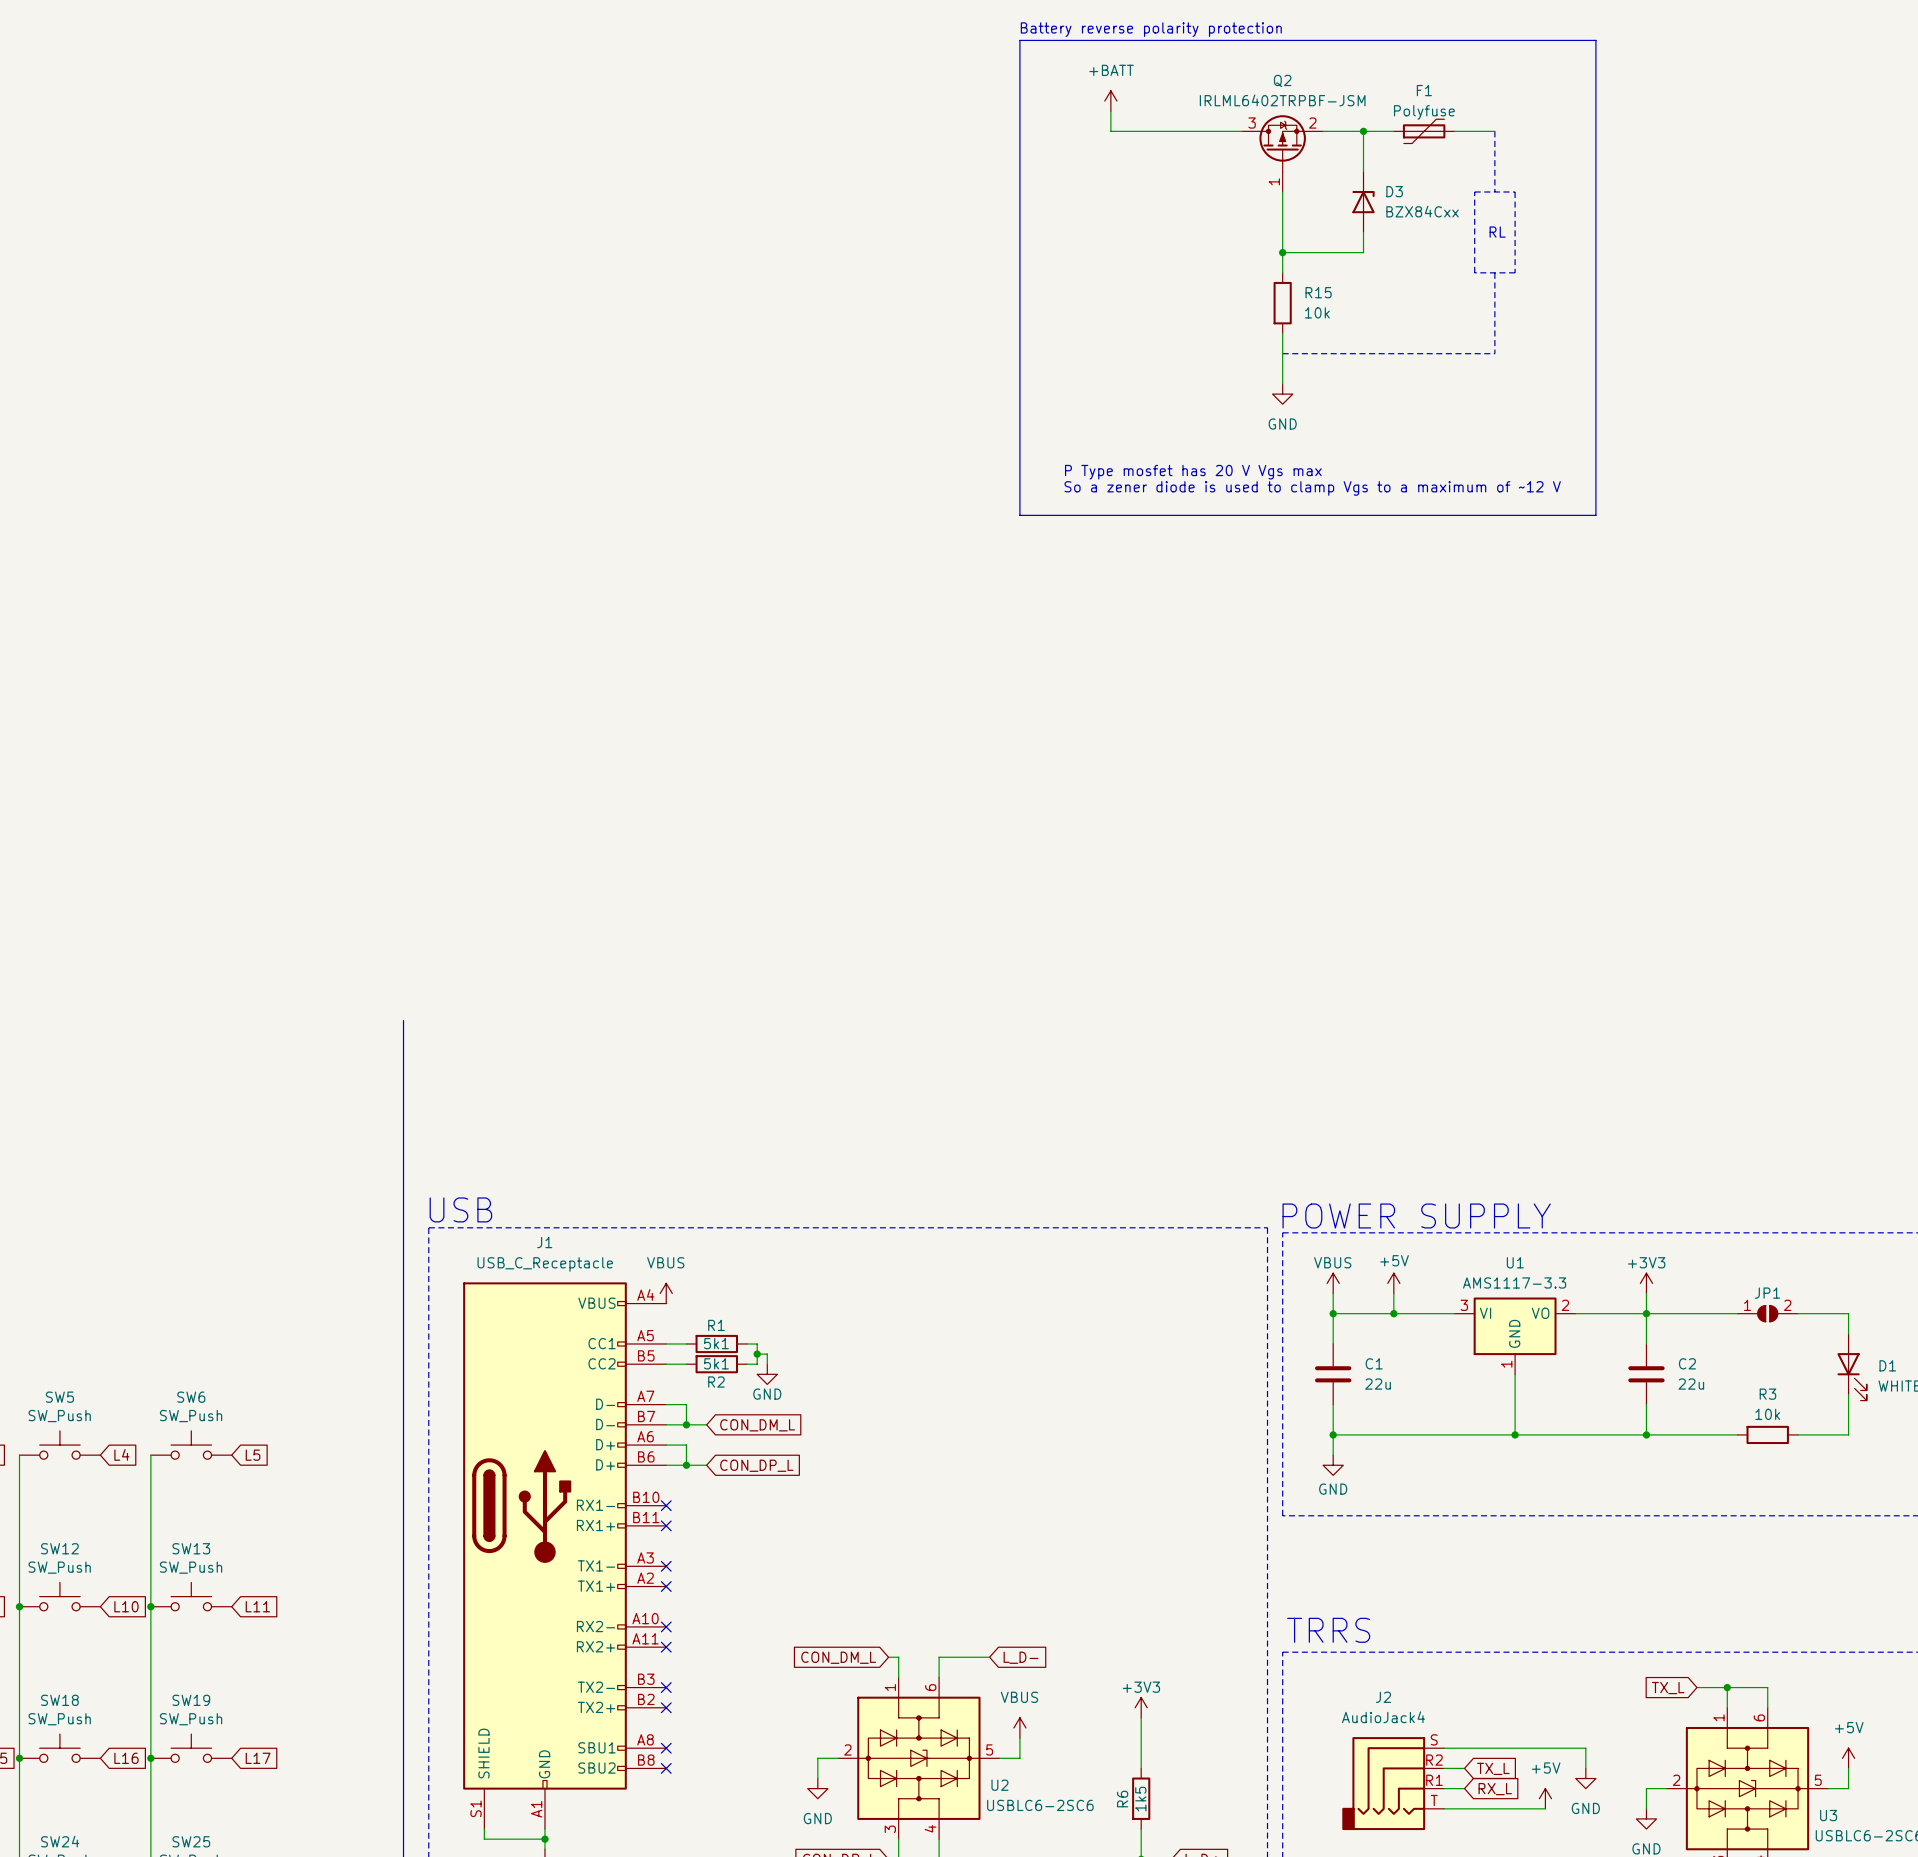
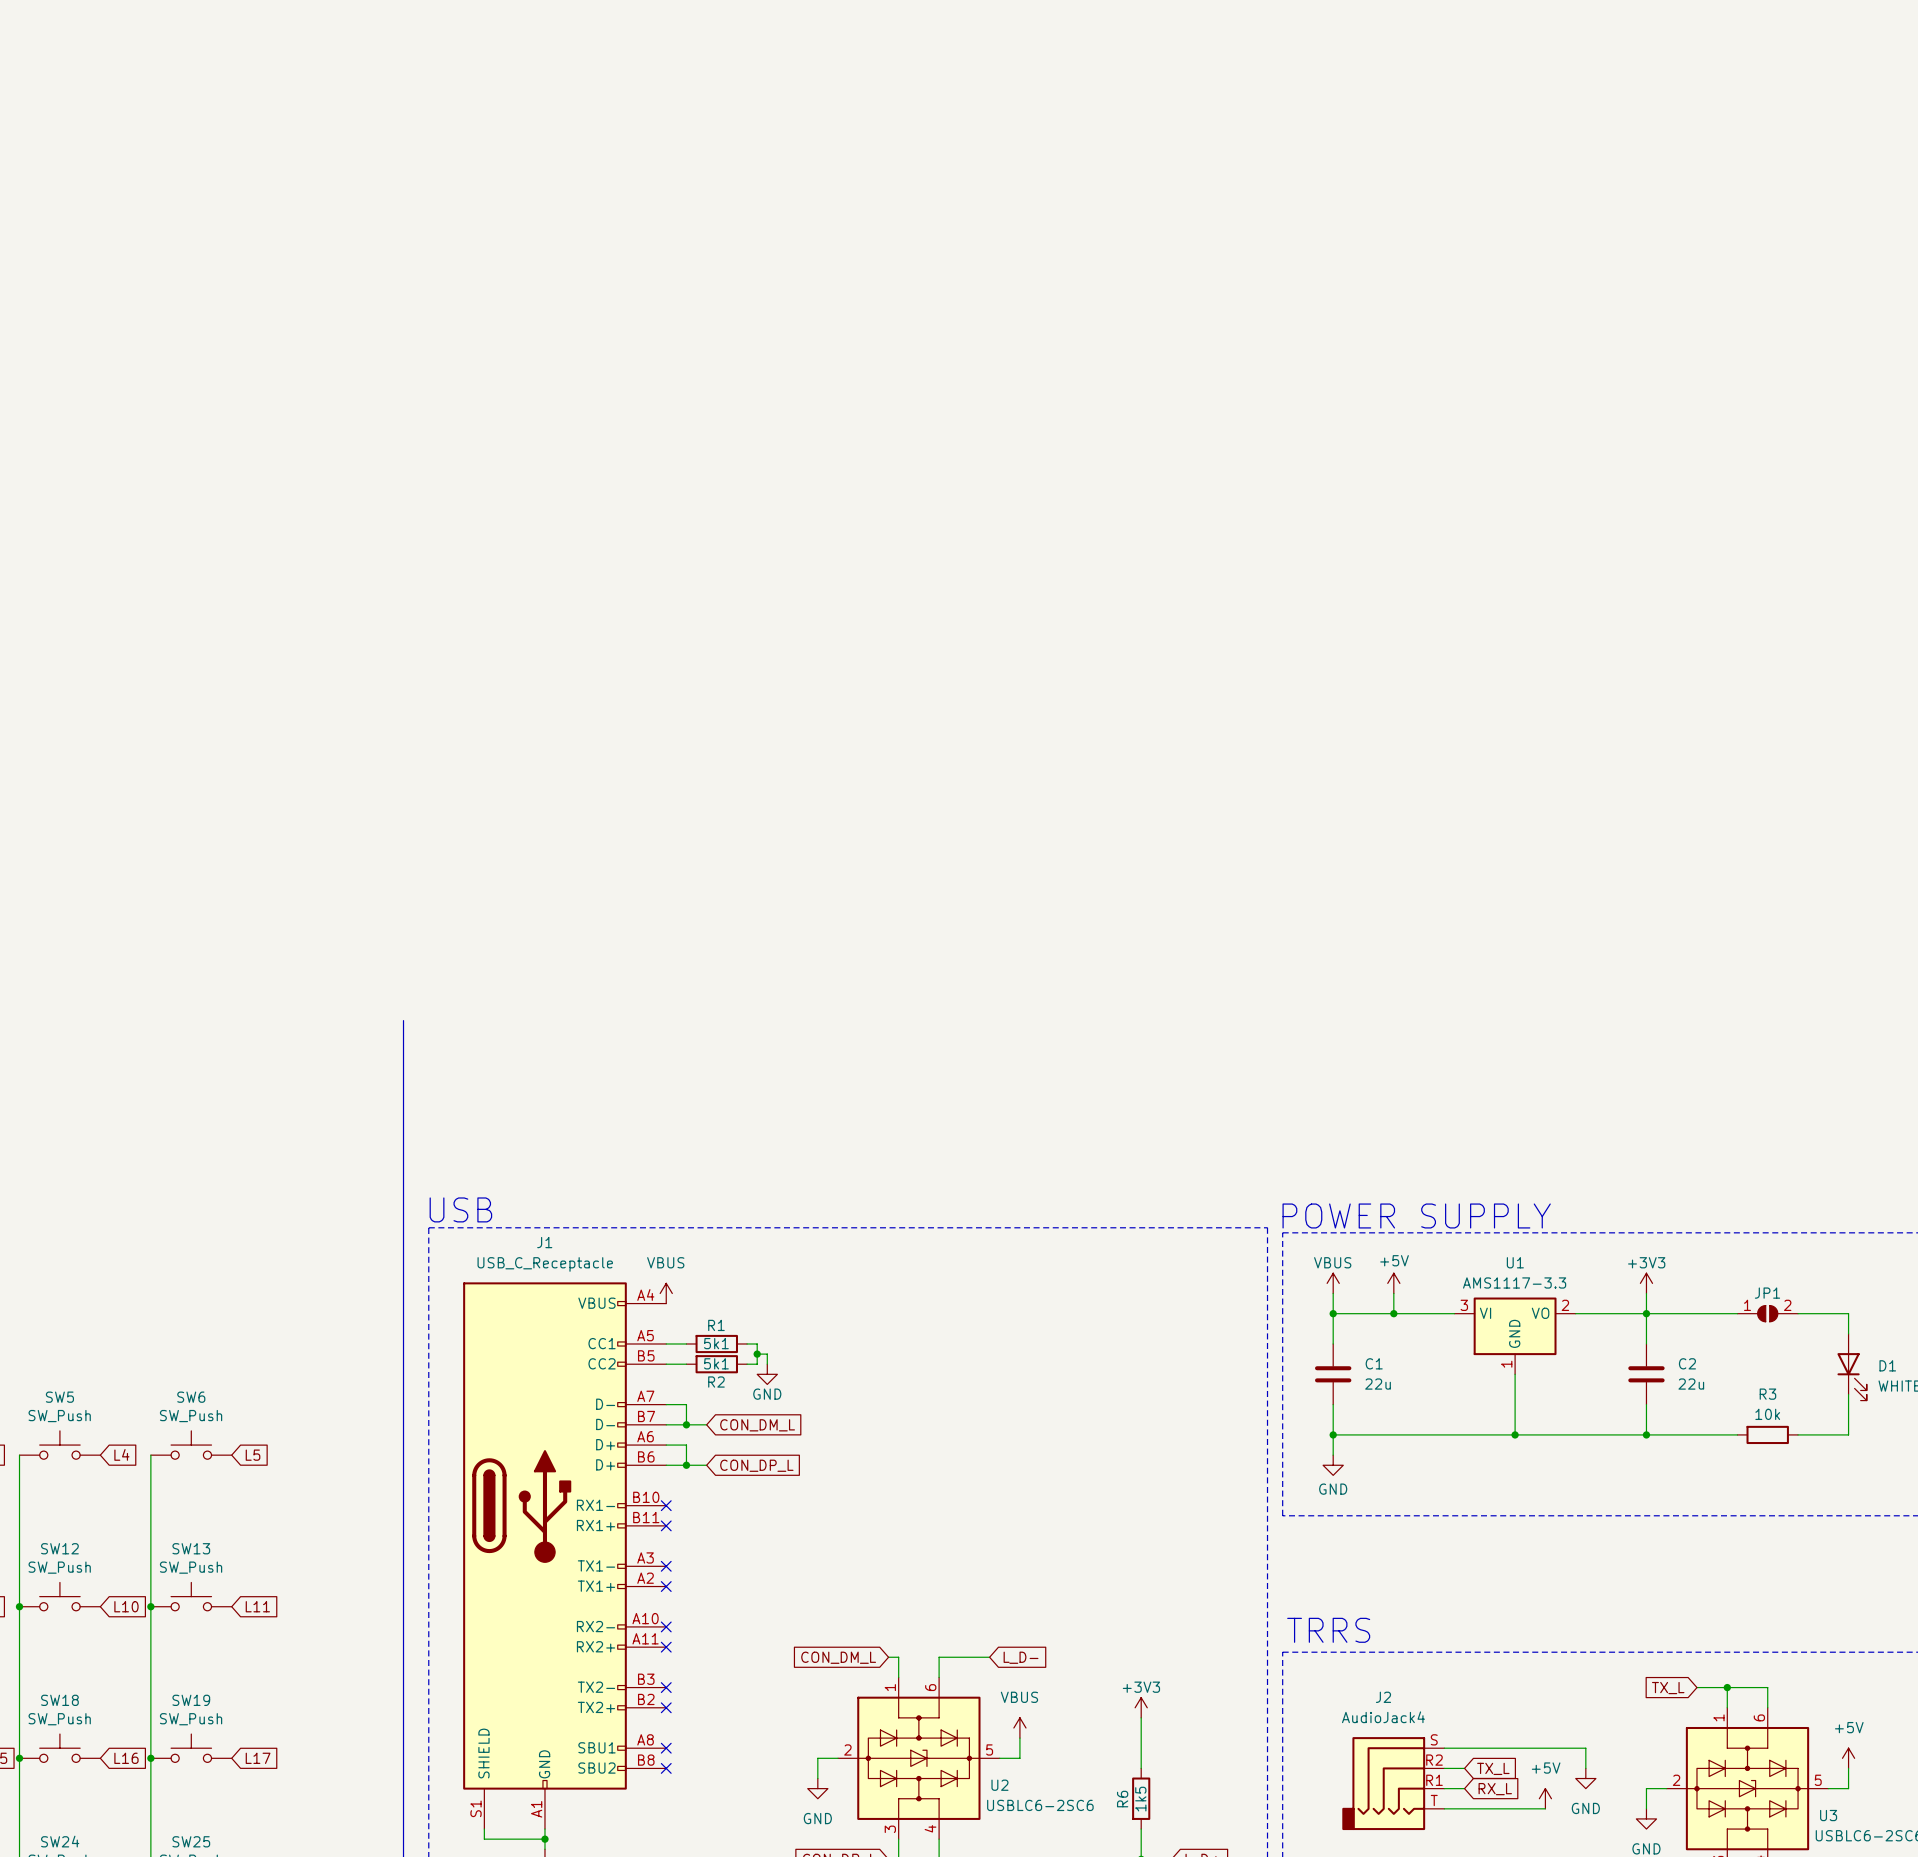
text: Battery reverse polarity protection (1151, 29) -> none
line: (1019, 40) (1595, 40) (1595, 515) (1019, 515) (1019, 40) -> none
power symbol: +BATT (1110, 101) -> none
wire: (1110, 111) (1110, 131) (1242, 131) -> none
wire: (1323, 131) (1393, 131) -> none
wire: (1363, 131) (1363, 171) -> none
junction: (1363, 131) -> none
F1: Polyfuse (1424, 131) -> none
wire: (1454, 131) (1494, 131) -> none
line: (1494, 131) (1494, 191) -> none
Q2: IRLML6402TRPBF-JSM (1282, 153) -> none
wire: (1282, 191) (1282, 272) -> none
line: (1474, 191) (1515, 191) (1515, 272) (1474, 272) (1474, 191) -> none
D3: BZX84Cxx (1363, 202) -> none
wire: (1363, 232) (1363, 252) (1282, 252) -> none
text: RL (1497, 232) -> none
junction: (1282, 252) -> none
line: (1494, 272) (1494, 353) (1282, 353) -> none
R15: 10k (1282, 303) -> none
wire: (1282, 333) (1282, 383) -> none
power symbol: GND (1282, 394) -> none
text: P Type mosfet has 20 V Vgs max (1193, 472) -> none
text: So a zener diode is used to clamp Vgs to a maximum of ~12 V (1312, 488) -> none

